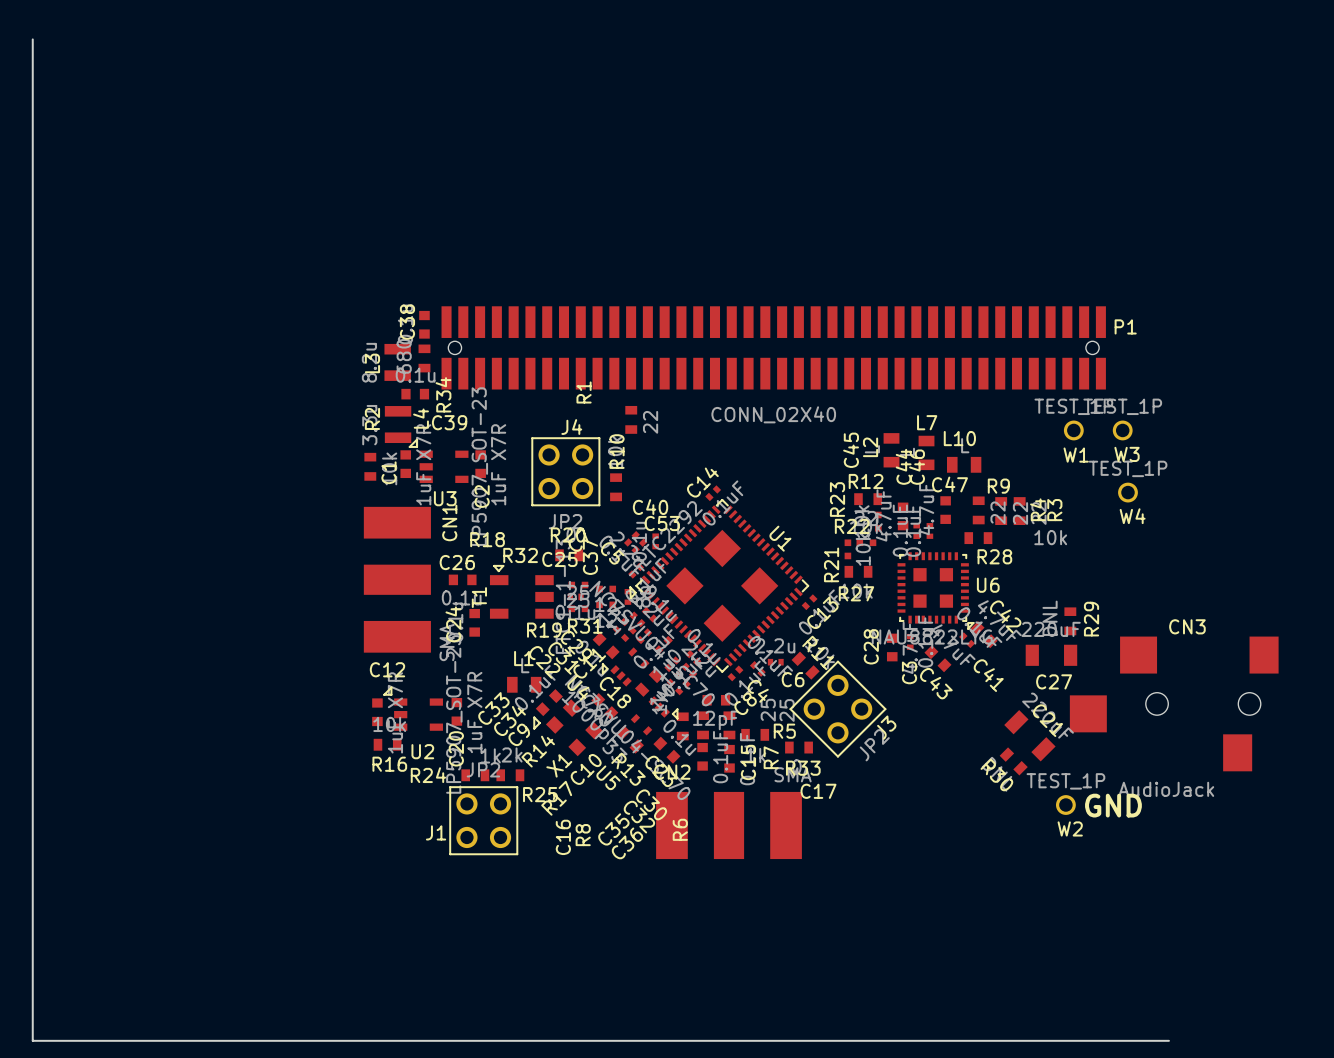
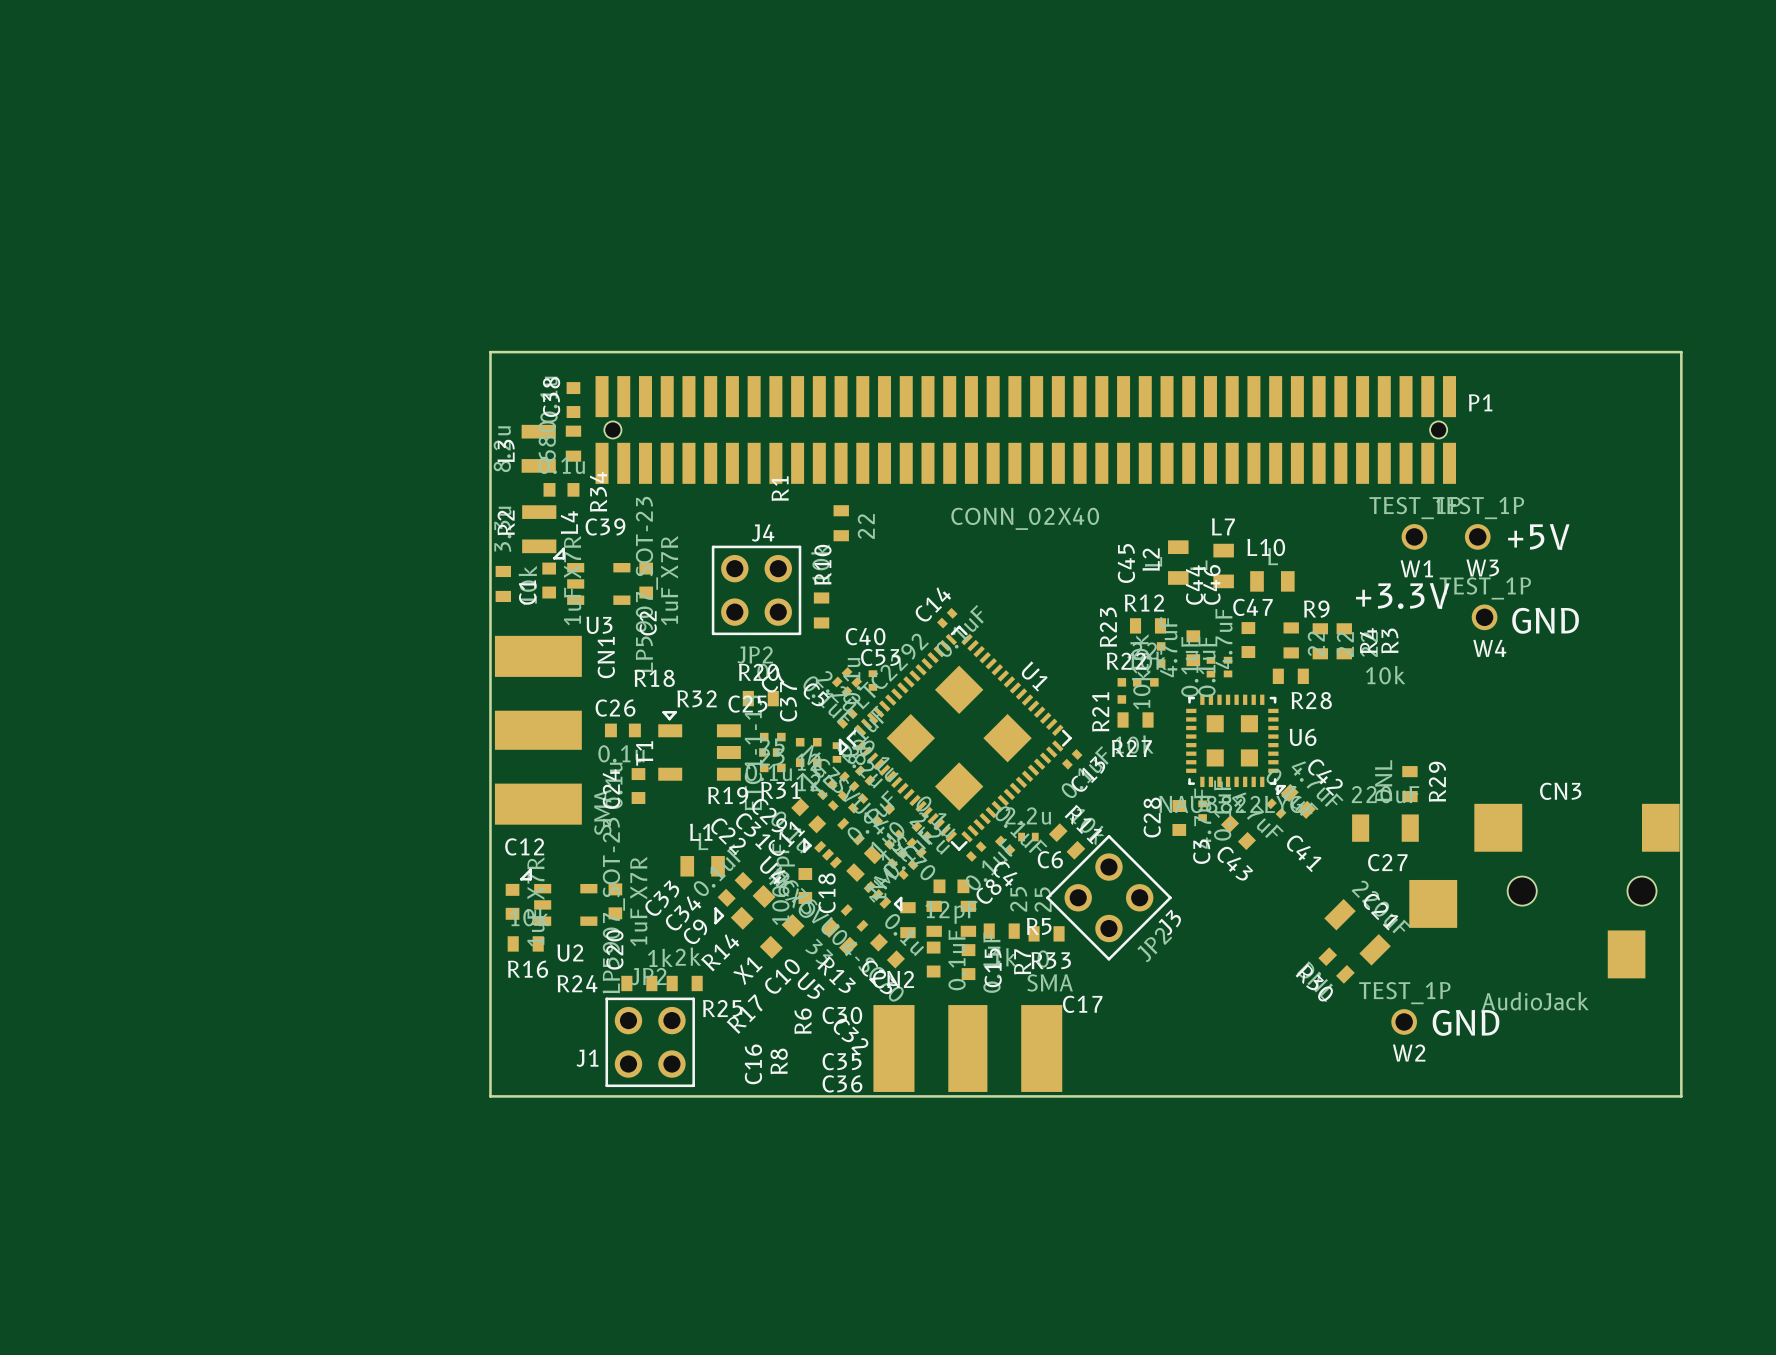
board edge: (32, 39) (32, 1040) (1168, 1040) -> none
board edge: none -> (490, 352) (1681, 352) (1681, 1096) (490, 1096) (490, 352)
text: none -> +5V (1538, 536)
text: none -> +3.3V (1402, 596)
text: none -> GND (1545, 620)
C18 rotation: 0° (604, 706) -> 45° clockwise (805, 885)
R33 position: (799, 747) -> (1046, 933)
C30 name rotation: 0° (651, 804) -> 45° counterclockwise (842, 1015)
C35 name rotation: 0° (613, 829) -> 45° clockwise (842, 1061)
R6 name position: R6 (680, 829) -> R6 (803, 1021)
C36 name rotation: 0° (627, 843) -> 45° clockwise (842, 1083)

